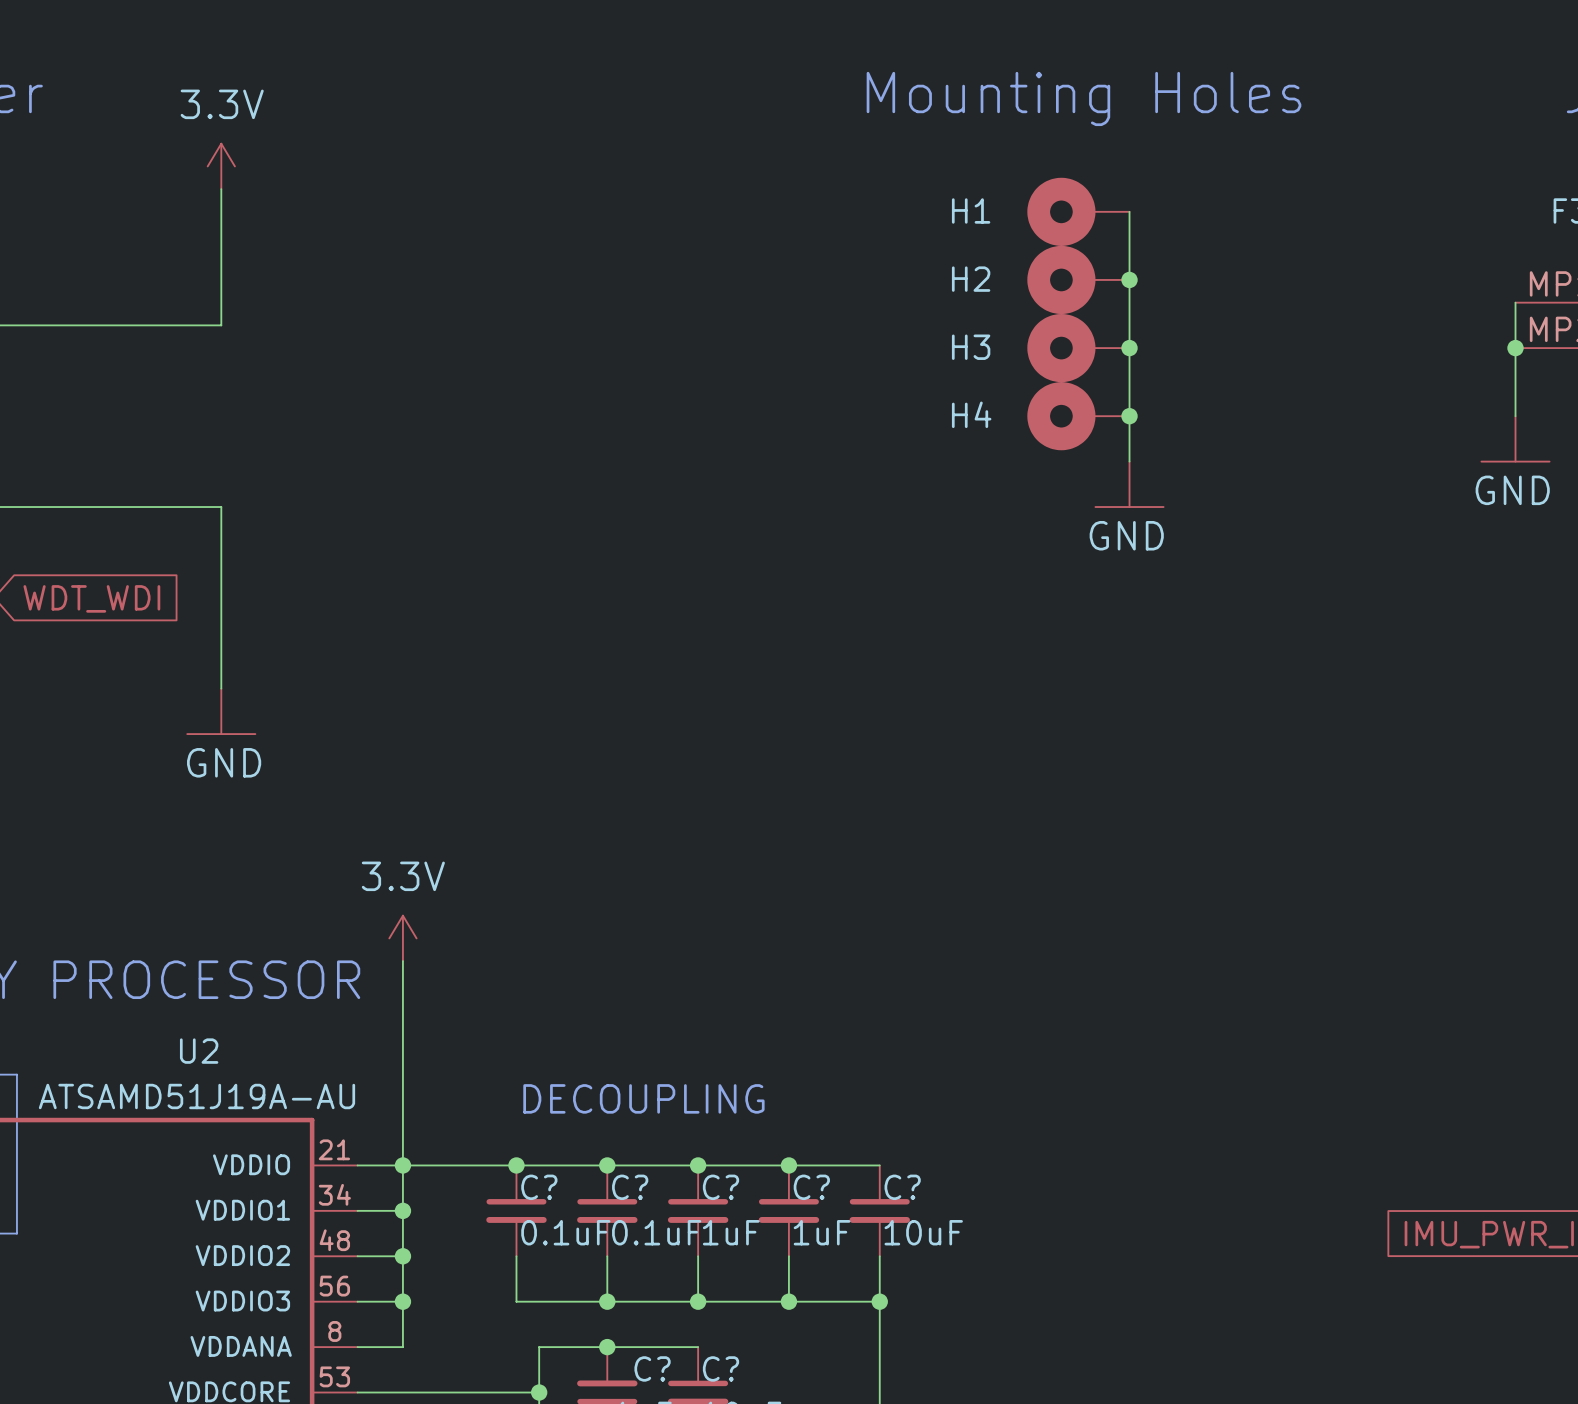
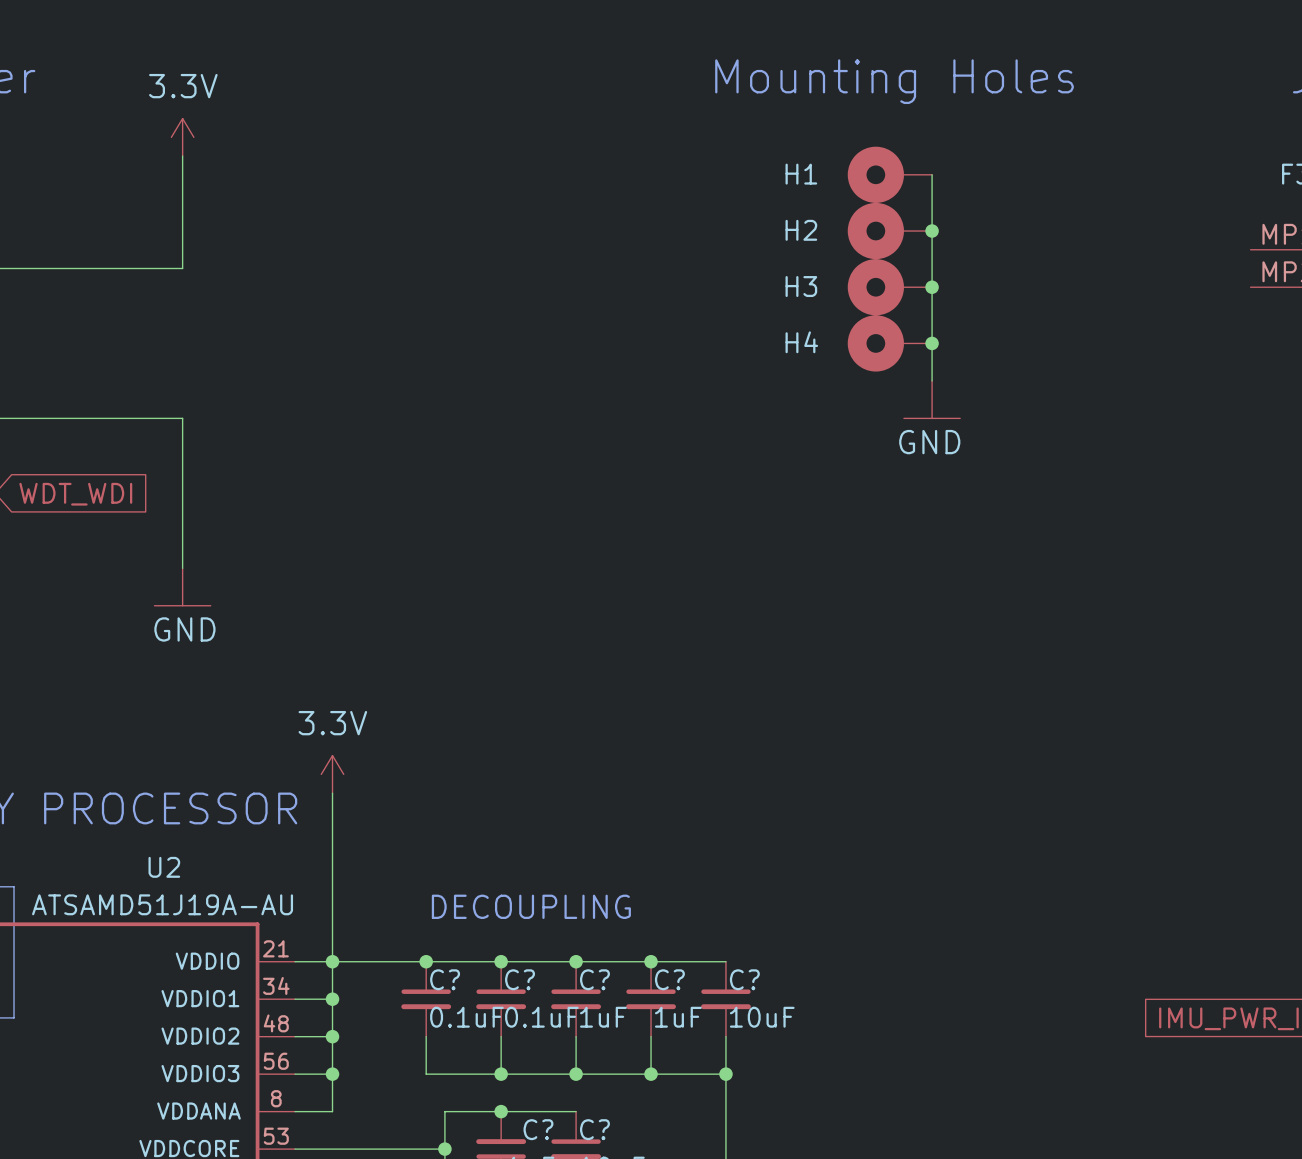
wire: (1515, 302) (1515, 416) -> none
junction: (1515, 348) -> none
power symbol: GND (1515, 438) -> none

